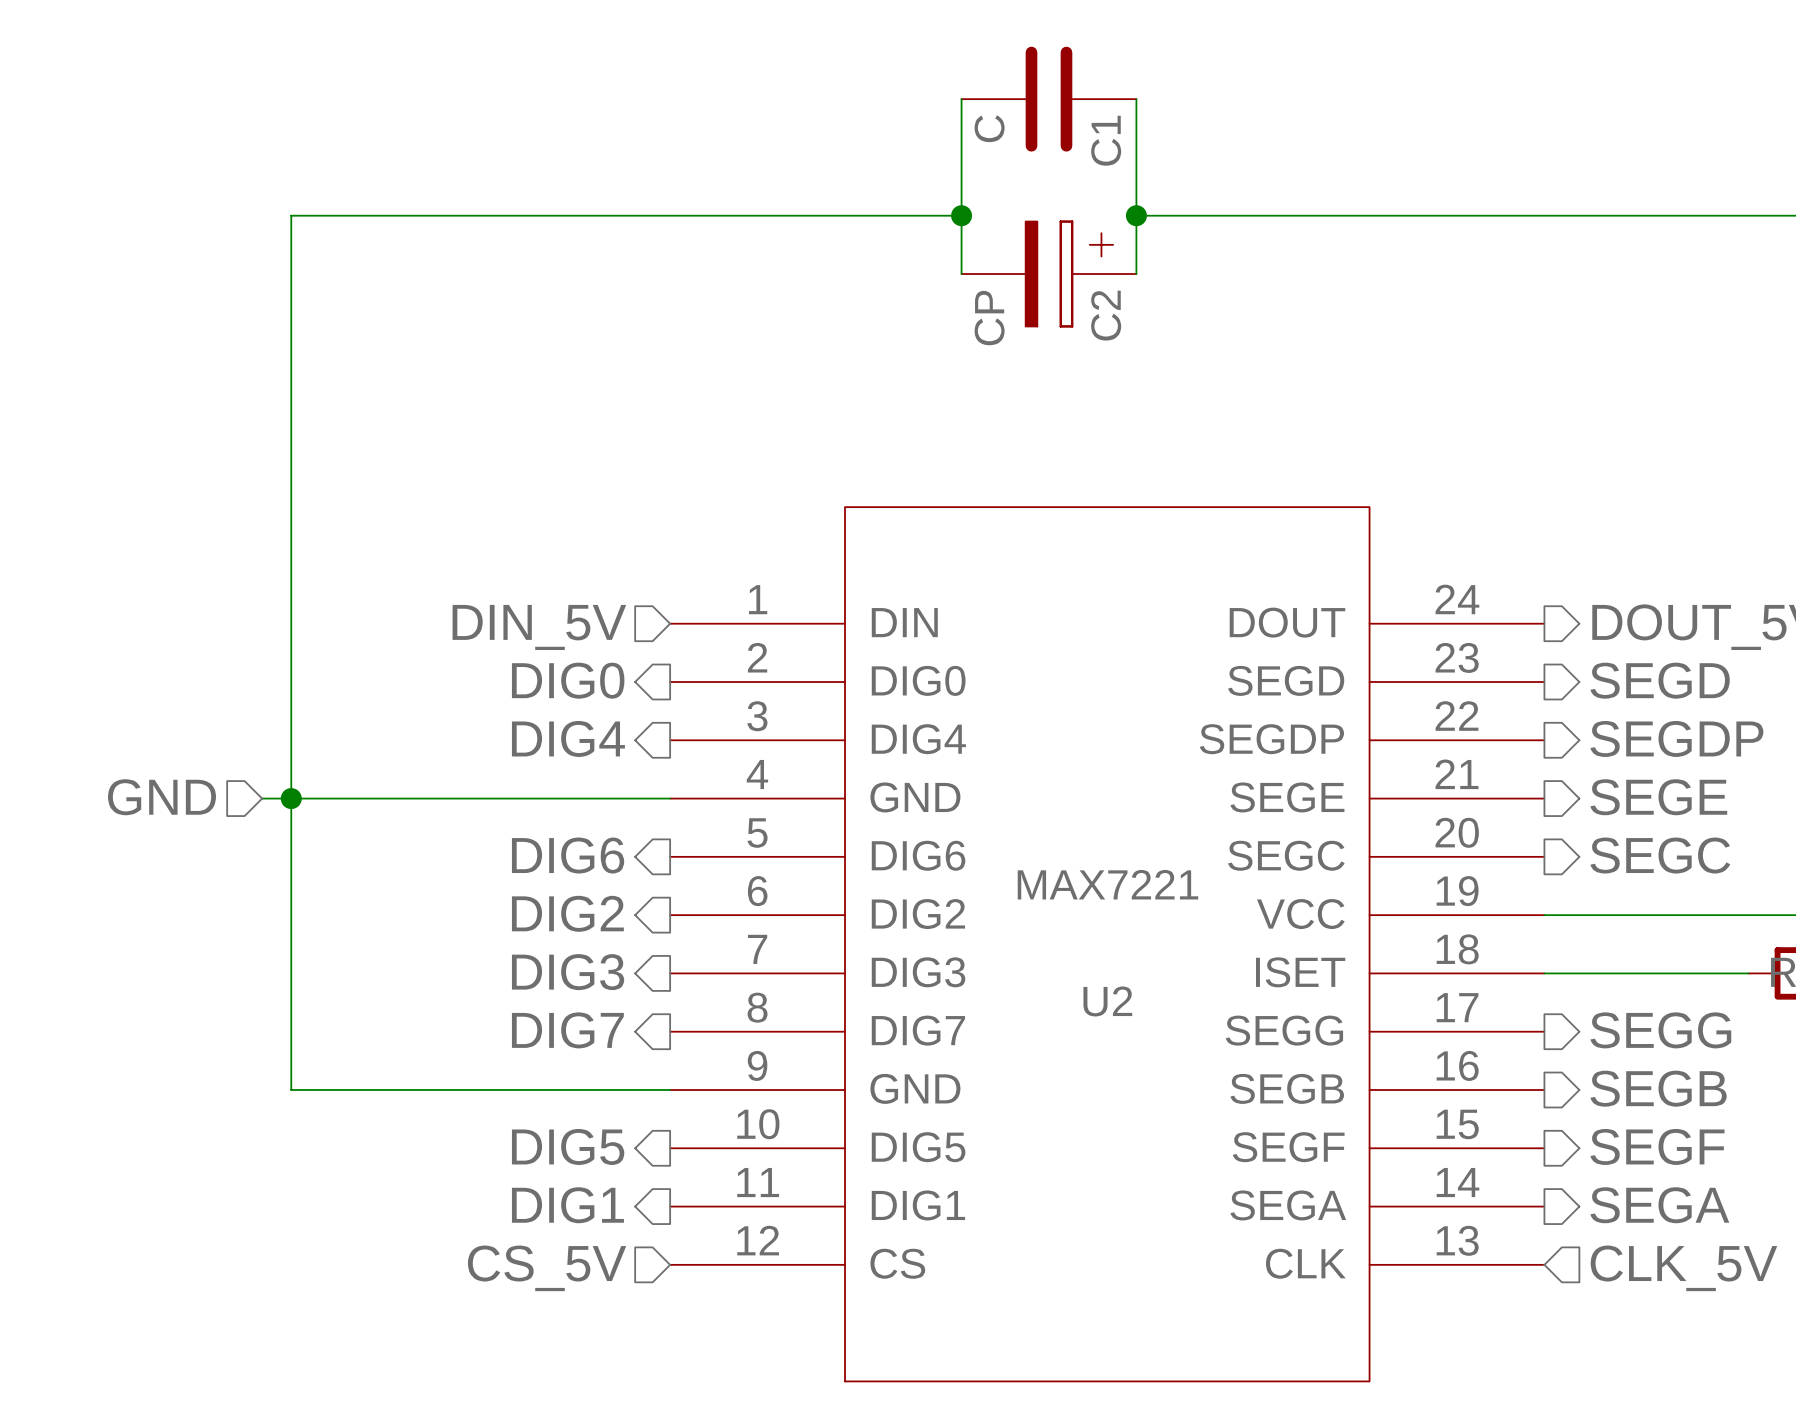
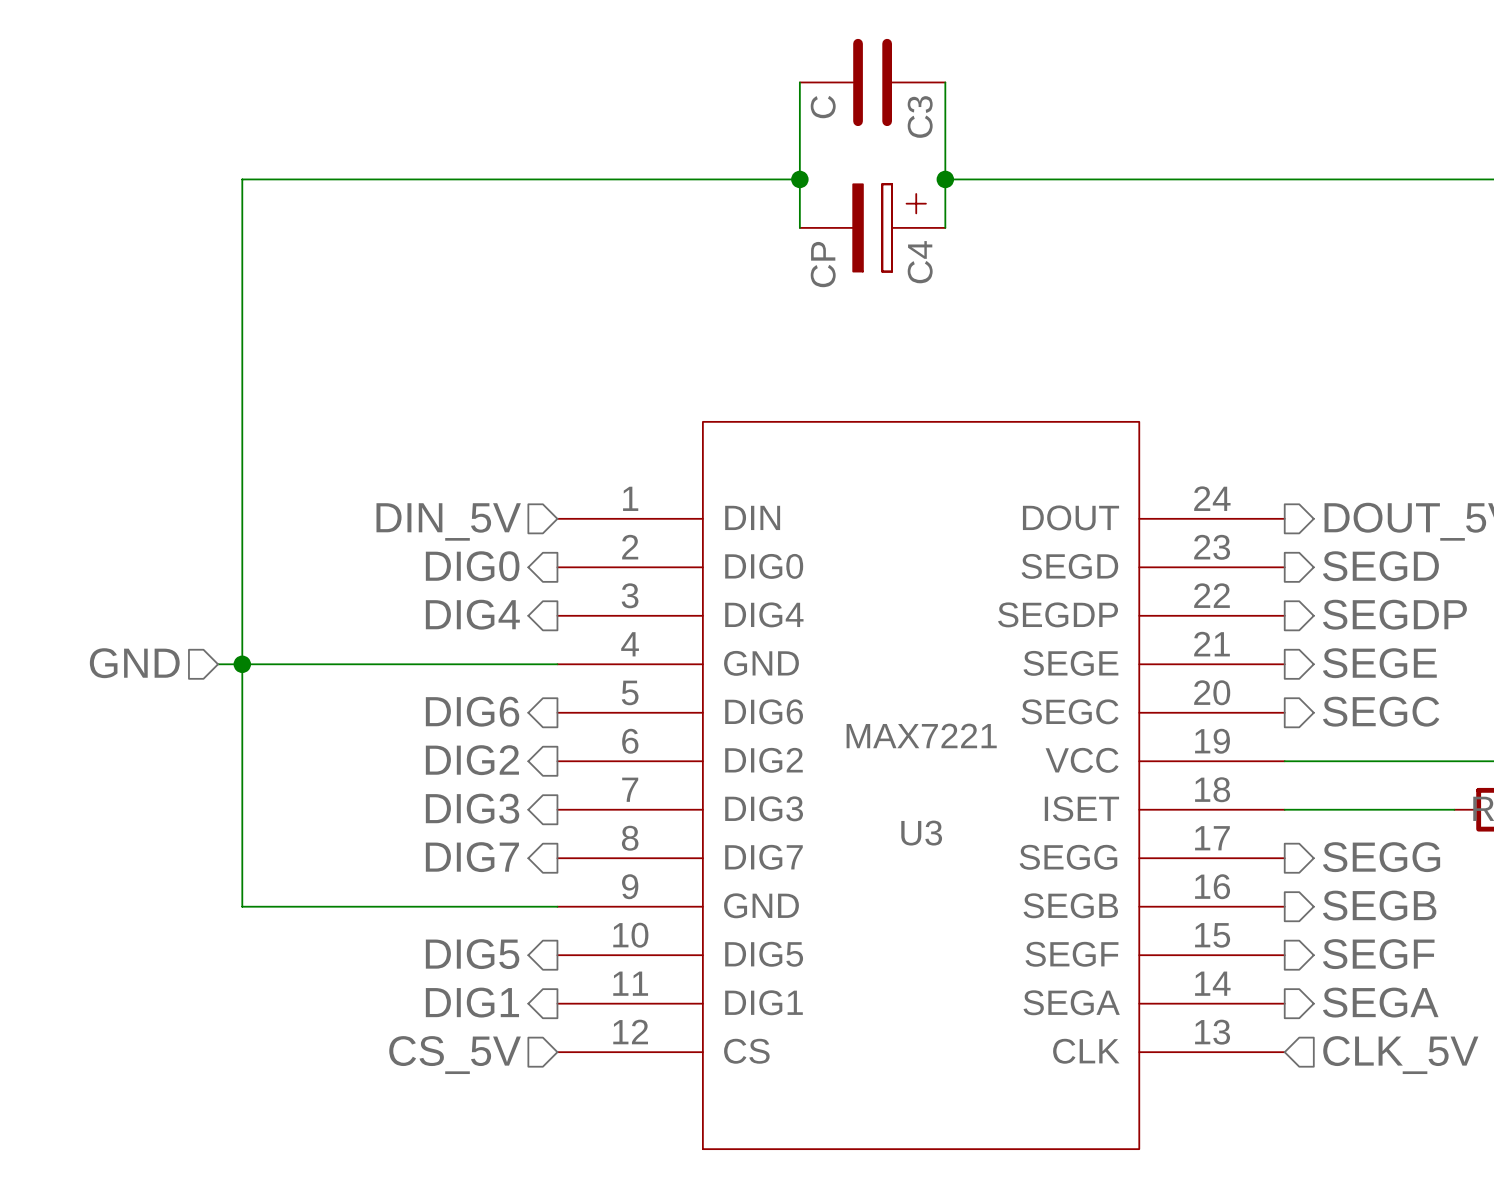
C1 name: C1 (1106, 140) -> C3 (920, 116)
C2 name: C2 (1106, 315) -> C4 (920, 262)
U2 name: U2 (1107, 1001) -> U3 (921, 833)

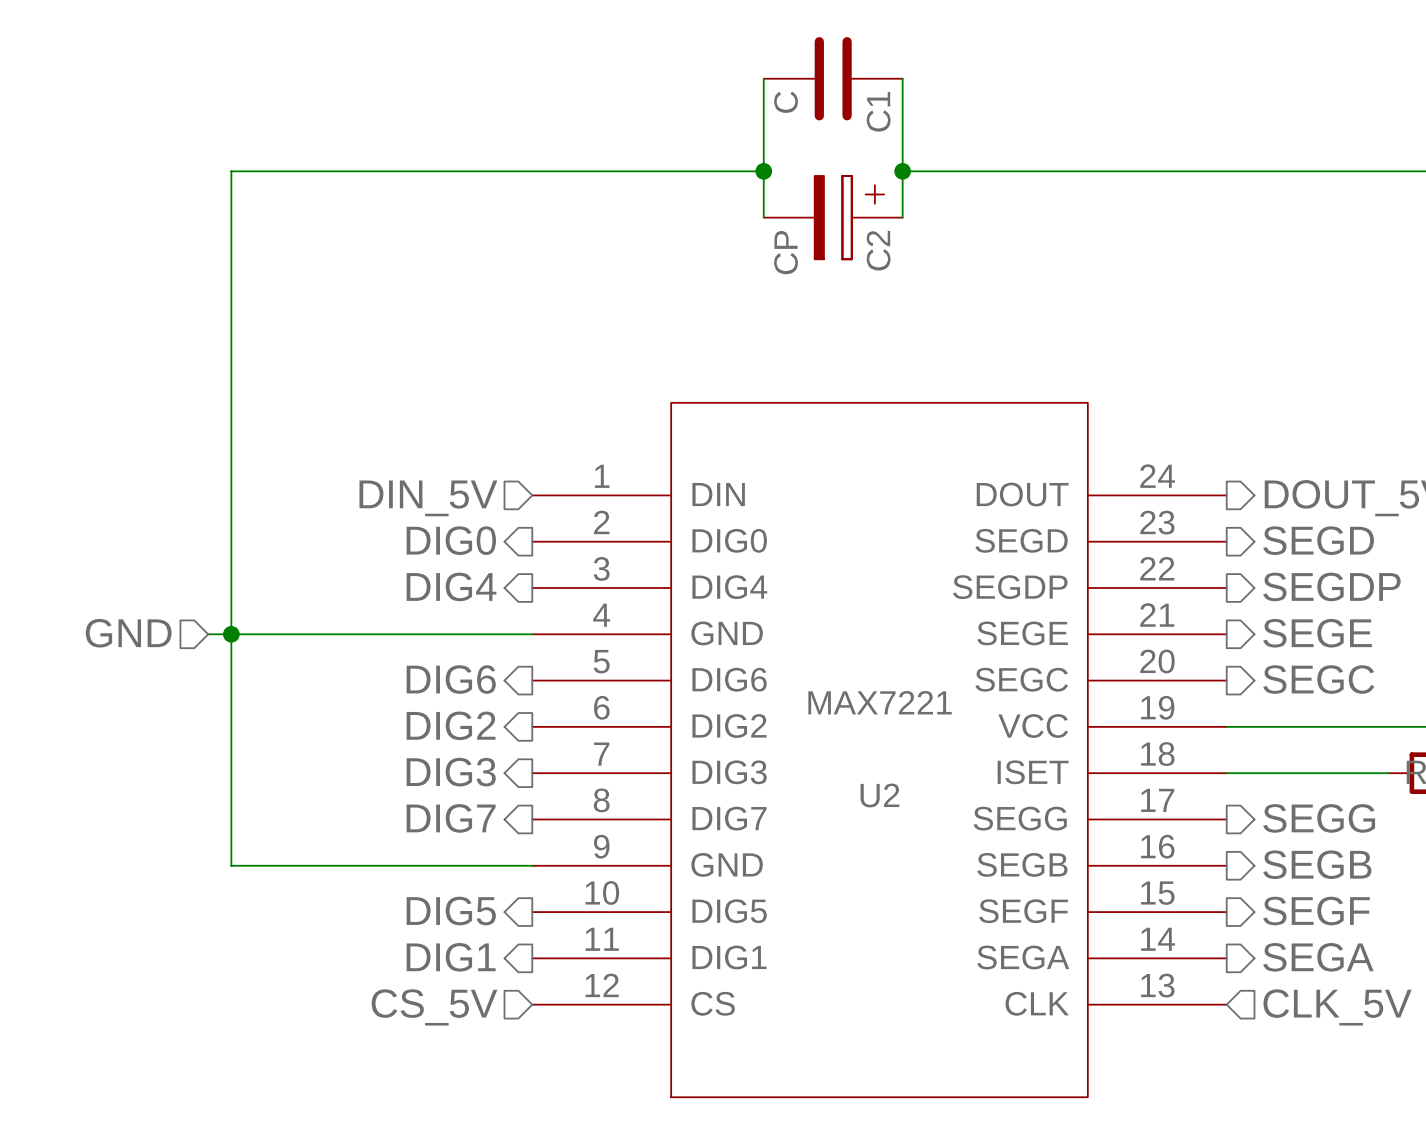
C3 name: C3 (920, 116) -> C1 (878, 111)
C4 name: C4 (920, 262) -> C2 (878, 250)
U3 name: U3 (921, 833) -> U2 (879, 795)

